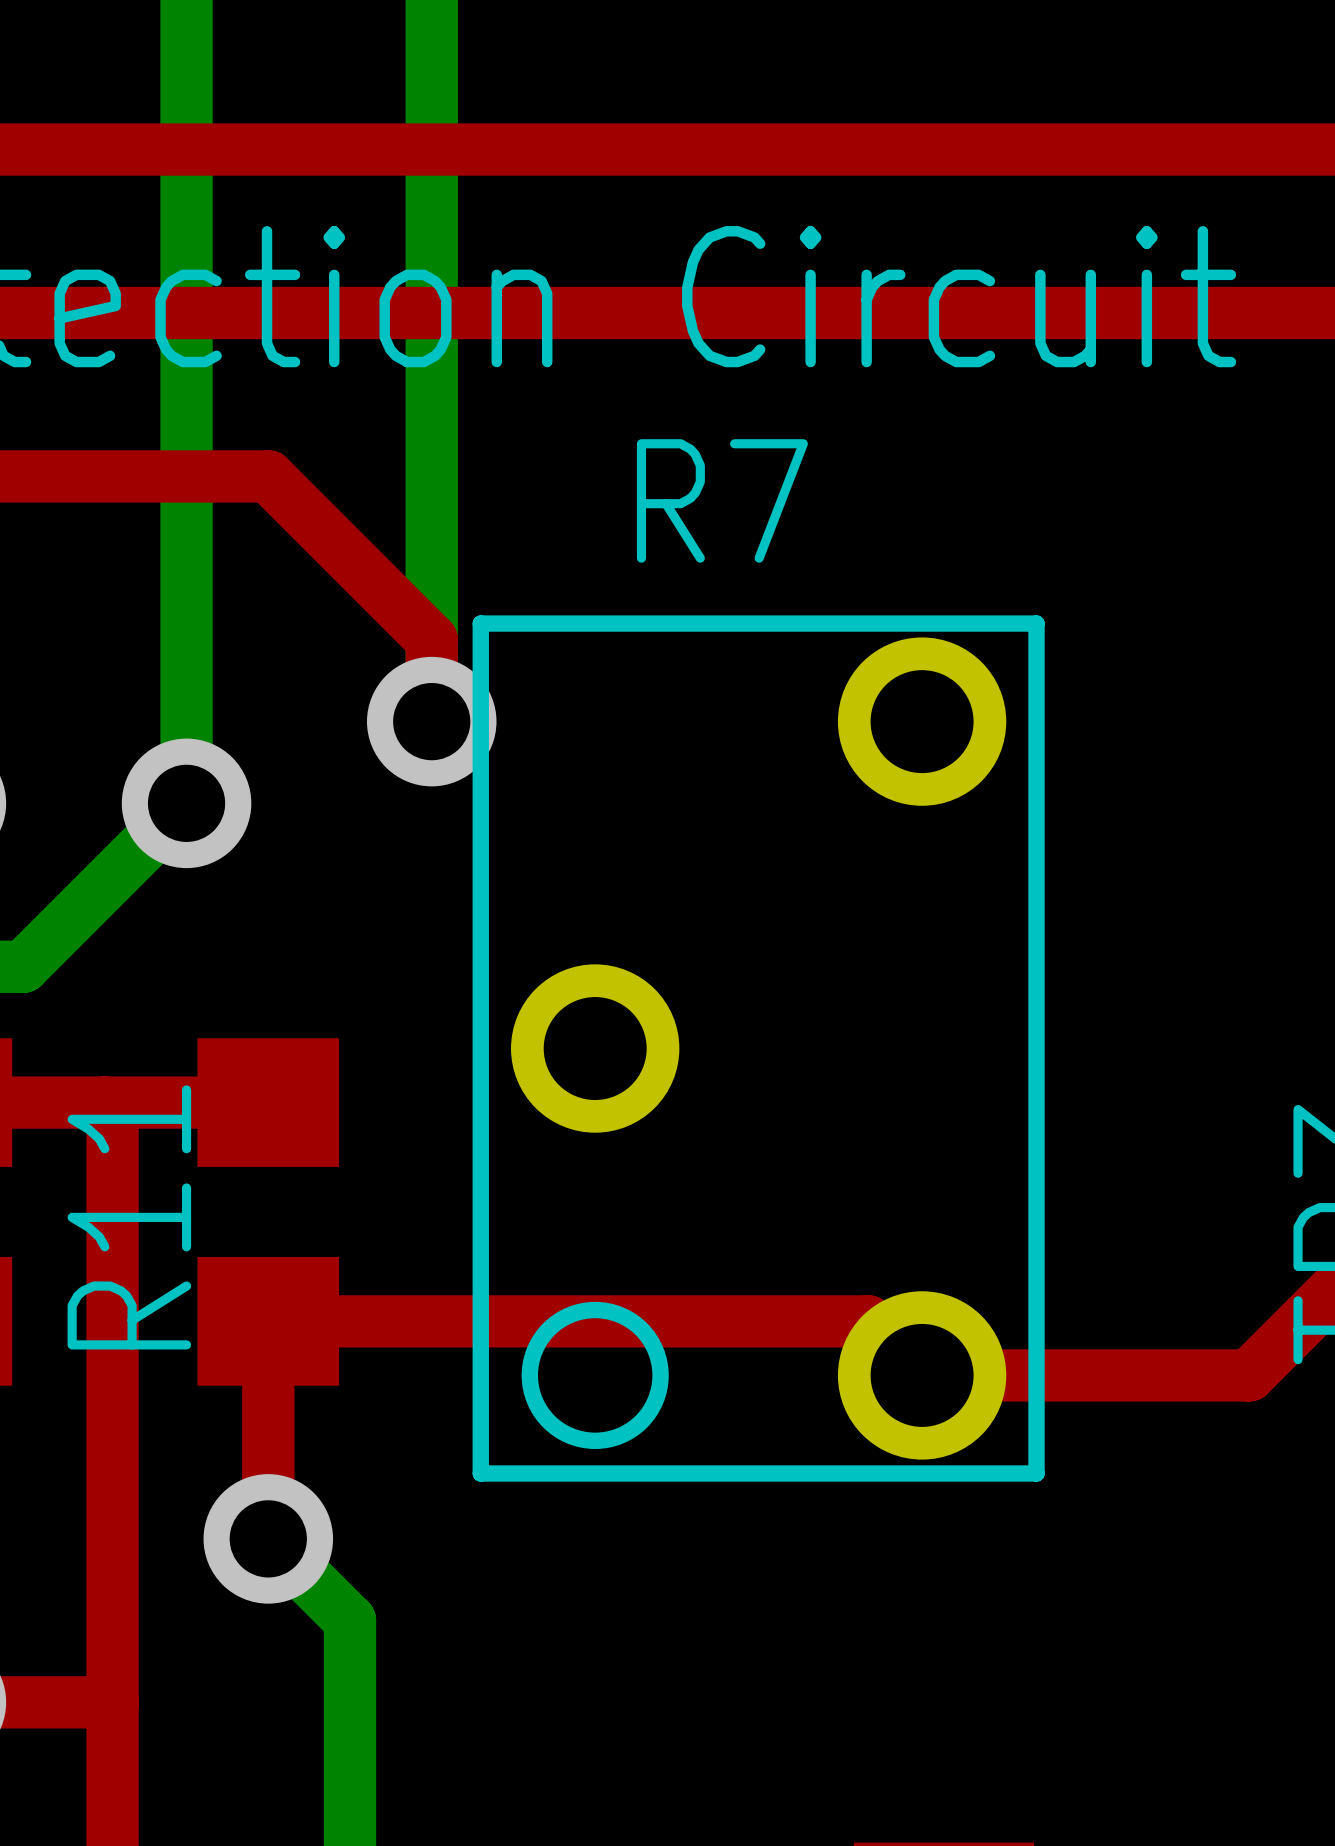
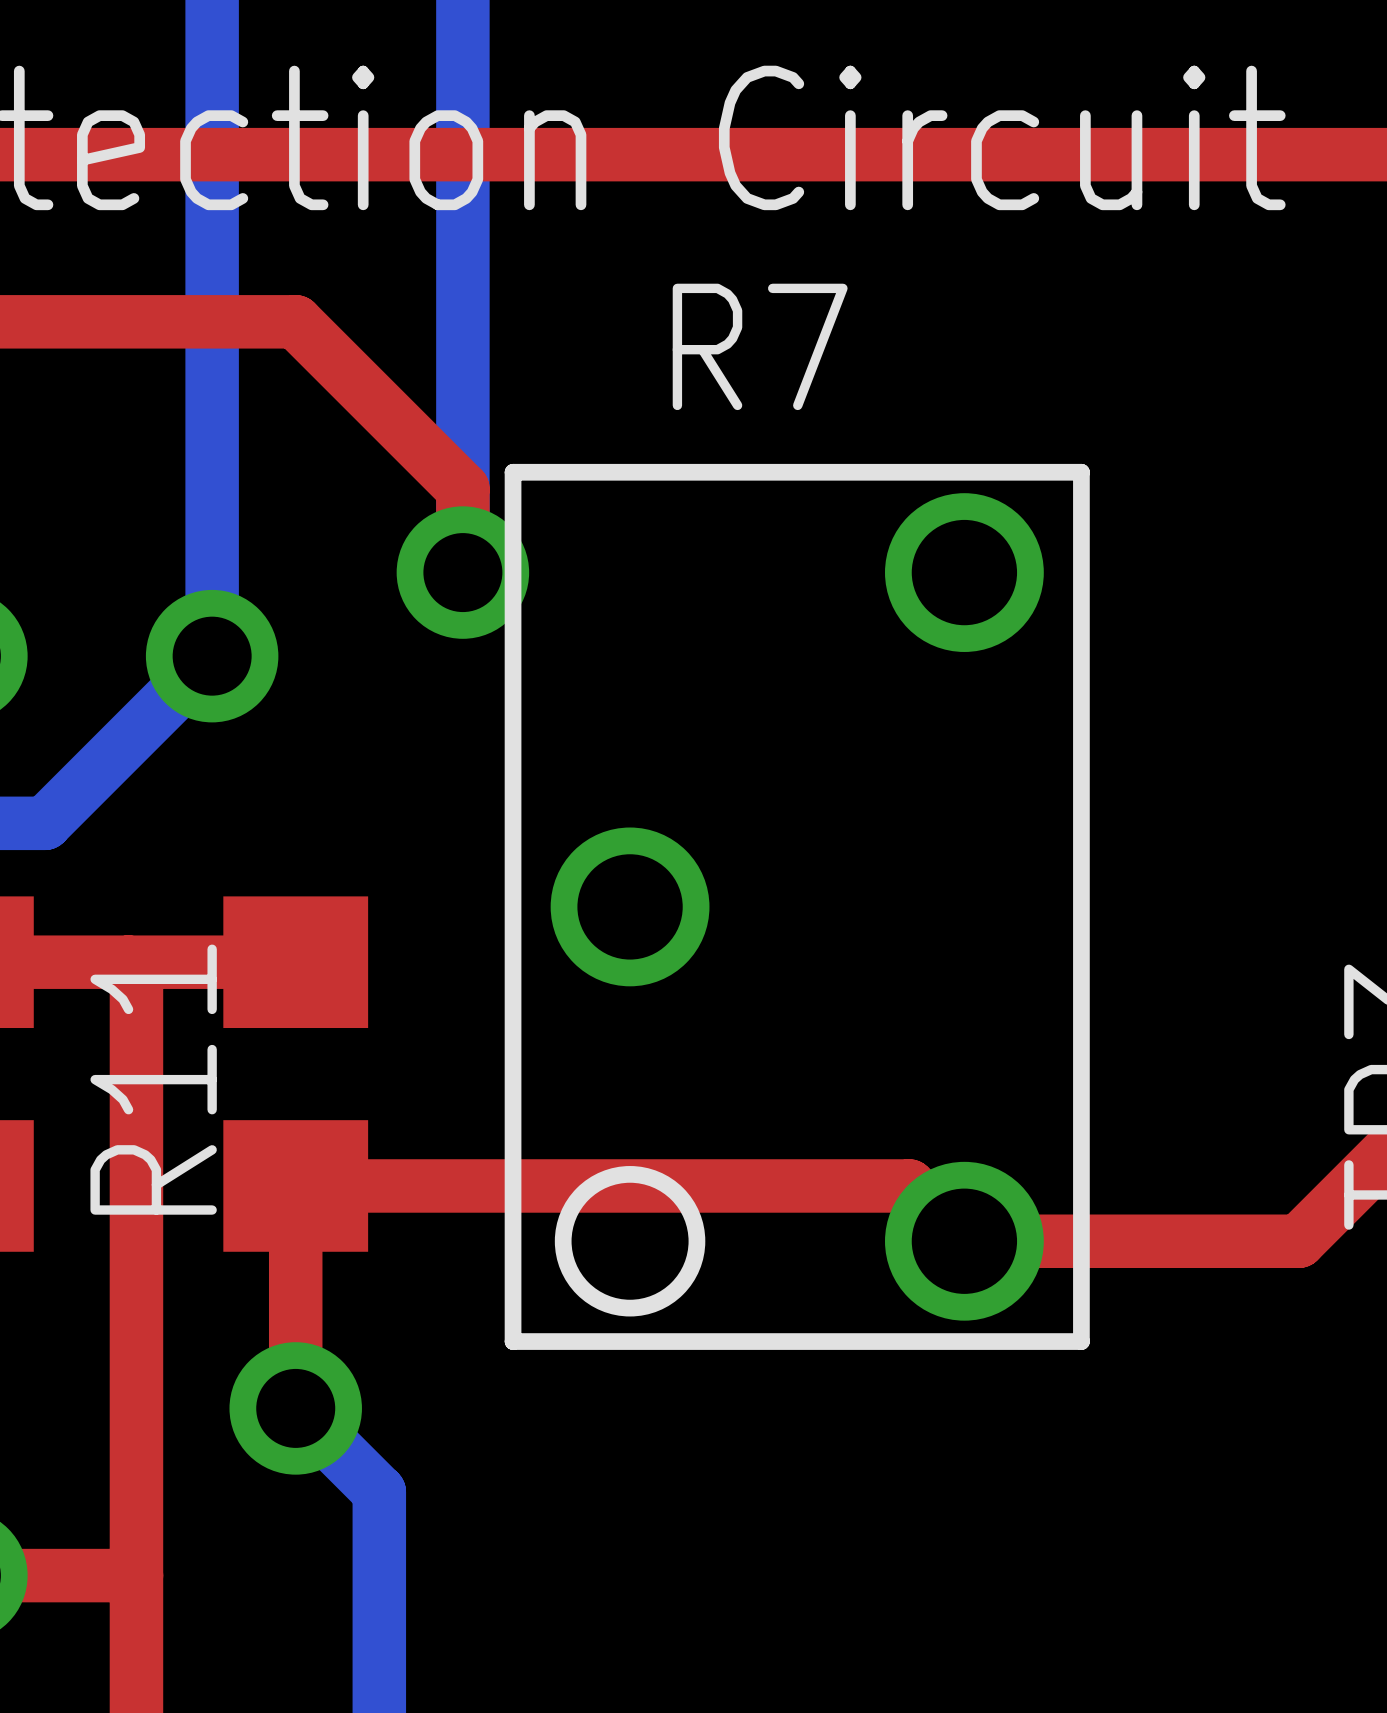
R7 footprint: [472, 615, 1045, 1482] -> [504, 463, 1090, 1350]

